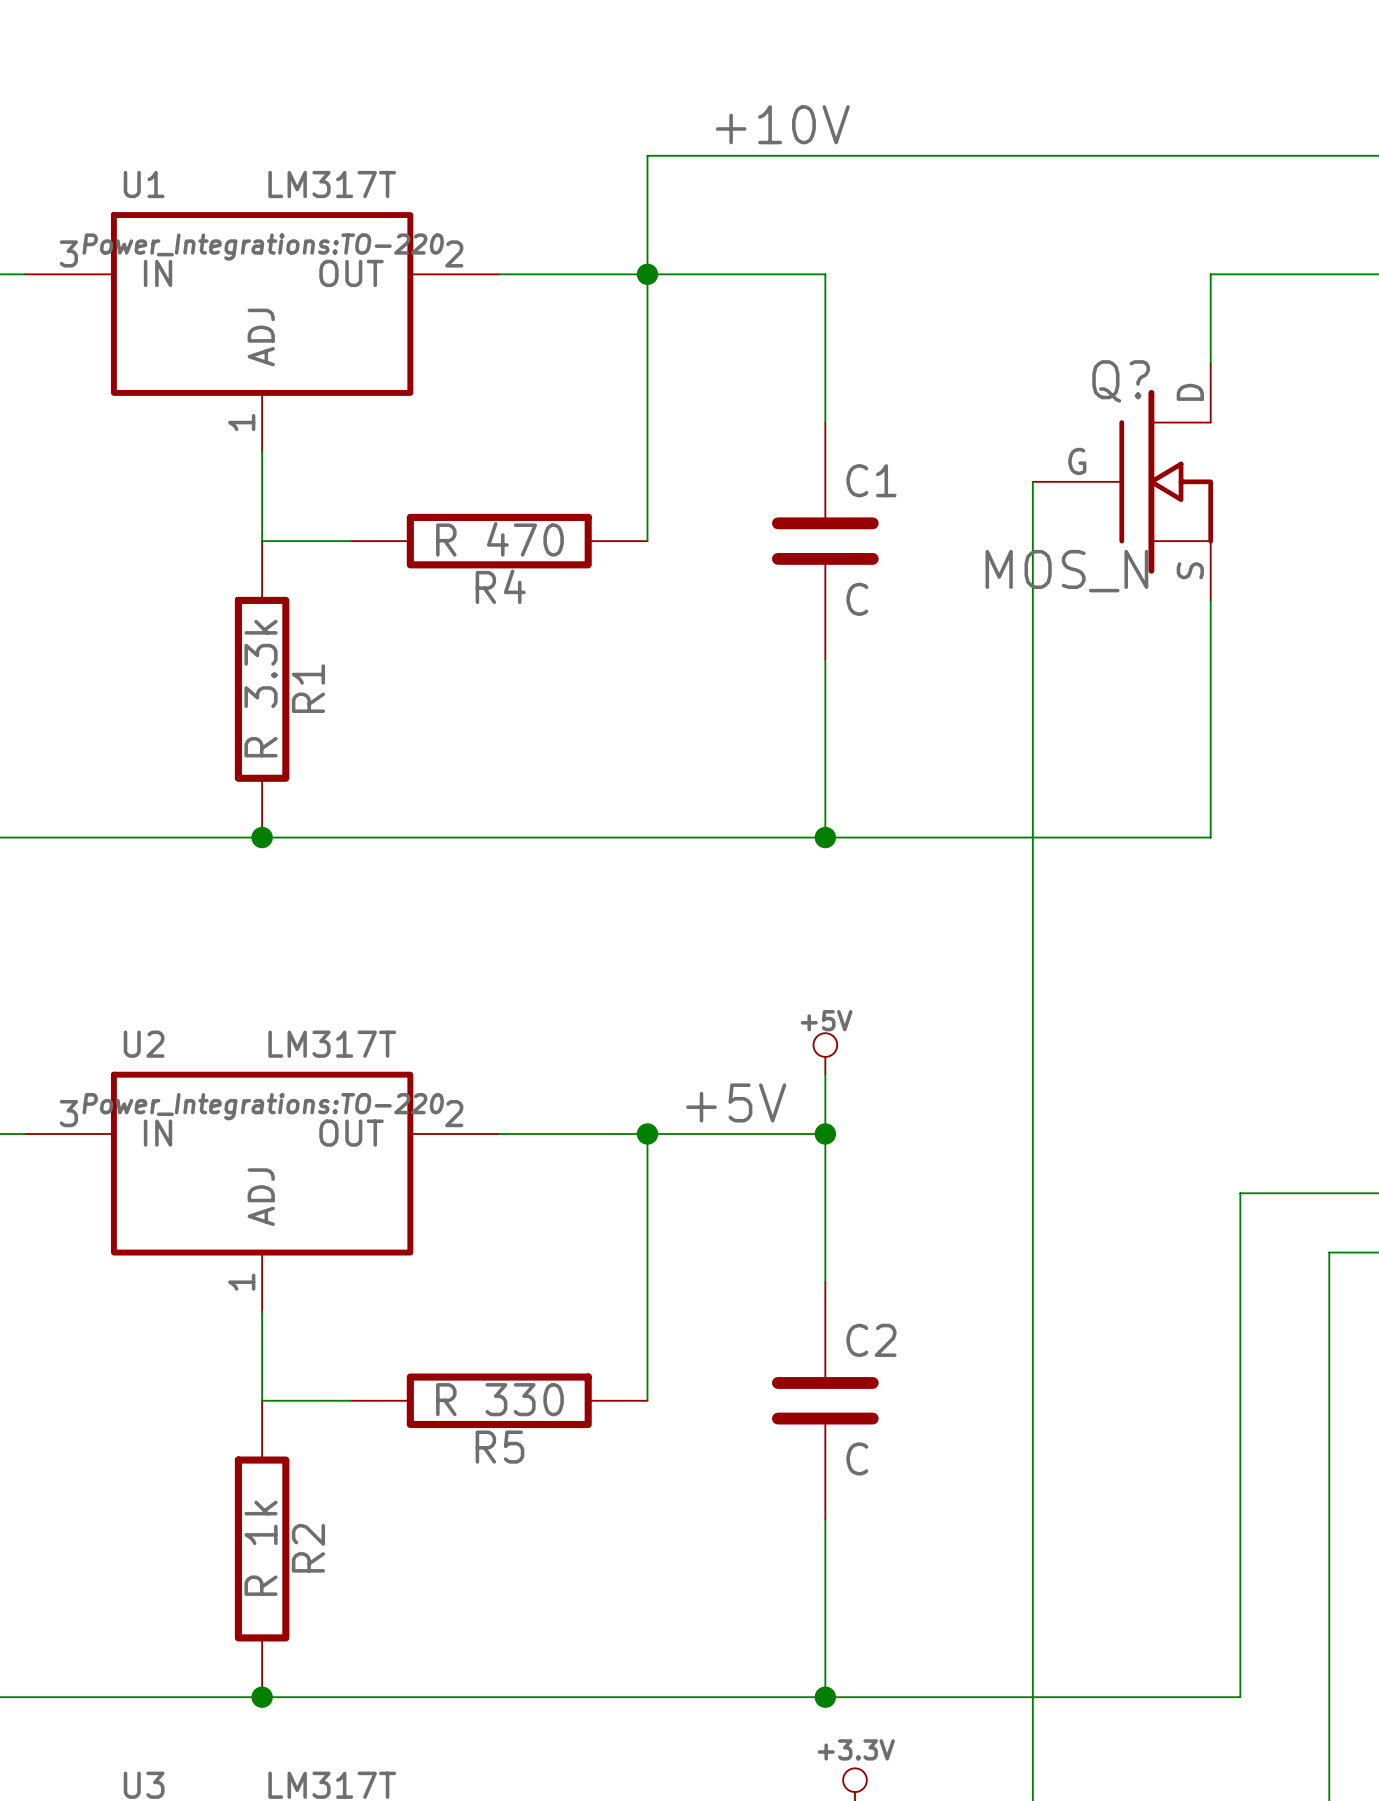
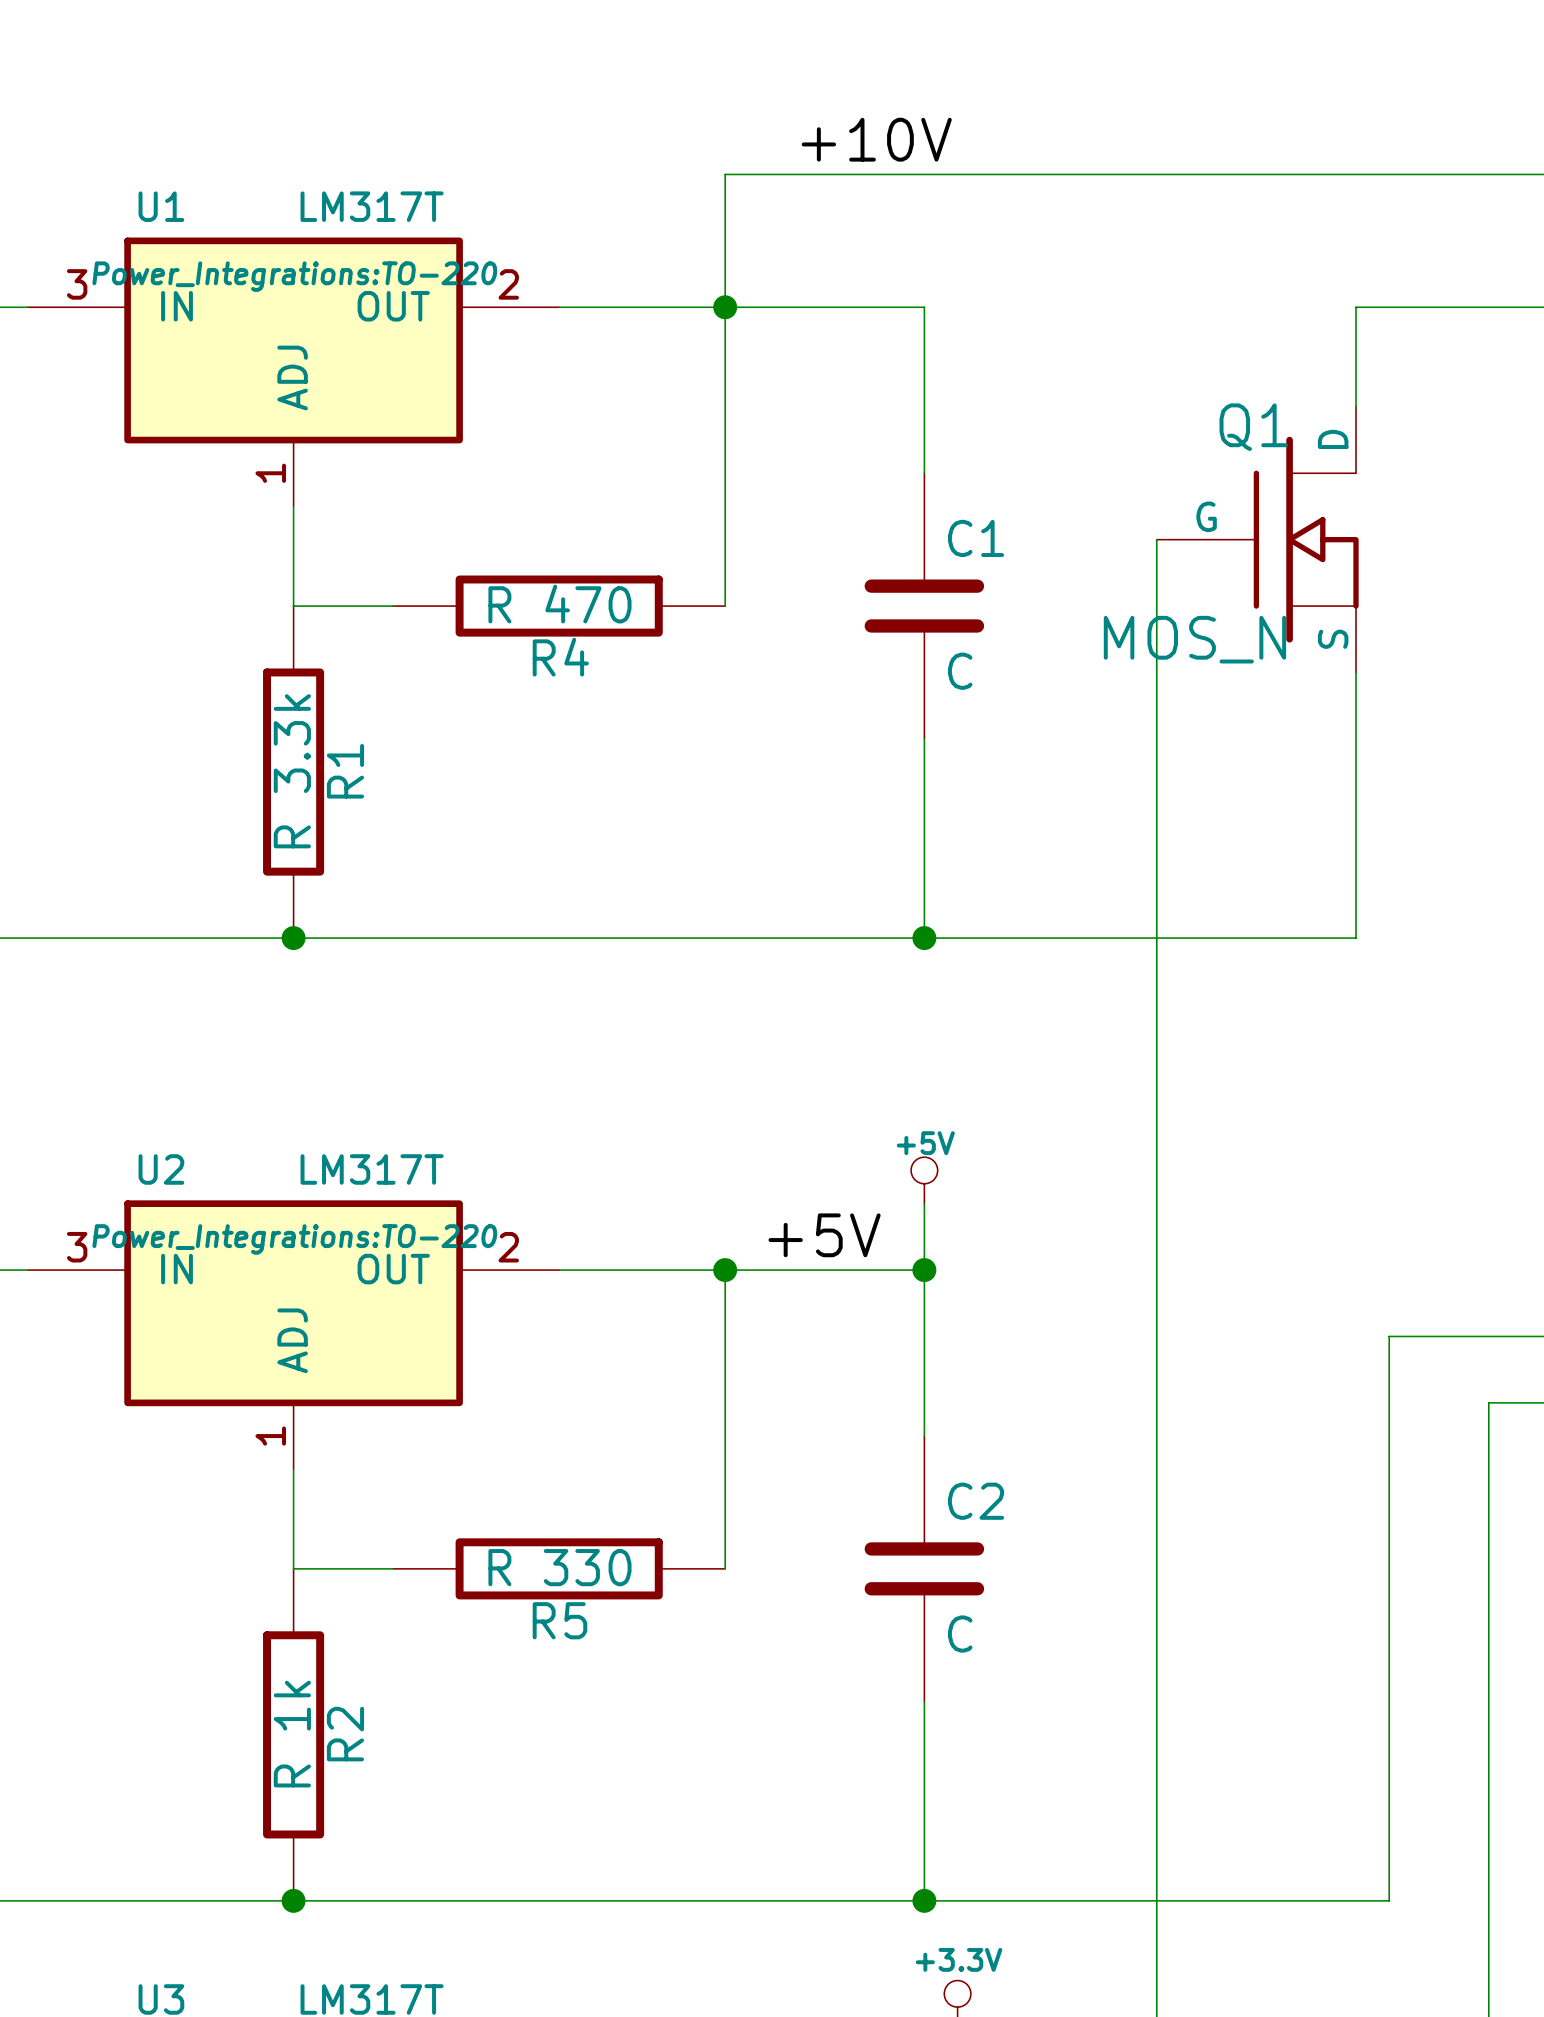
Q? name: Q? (1121, 381) -> Q1 (1253, 427)

